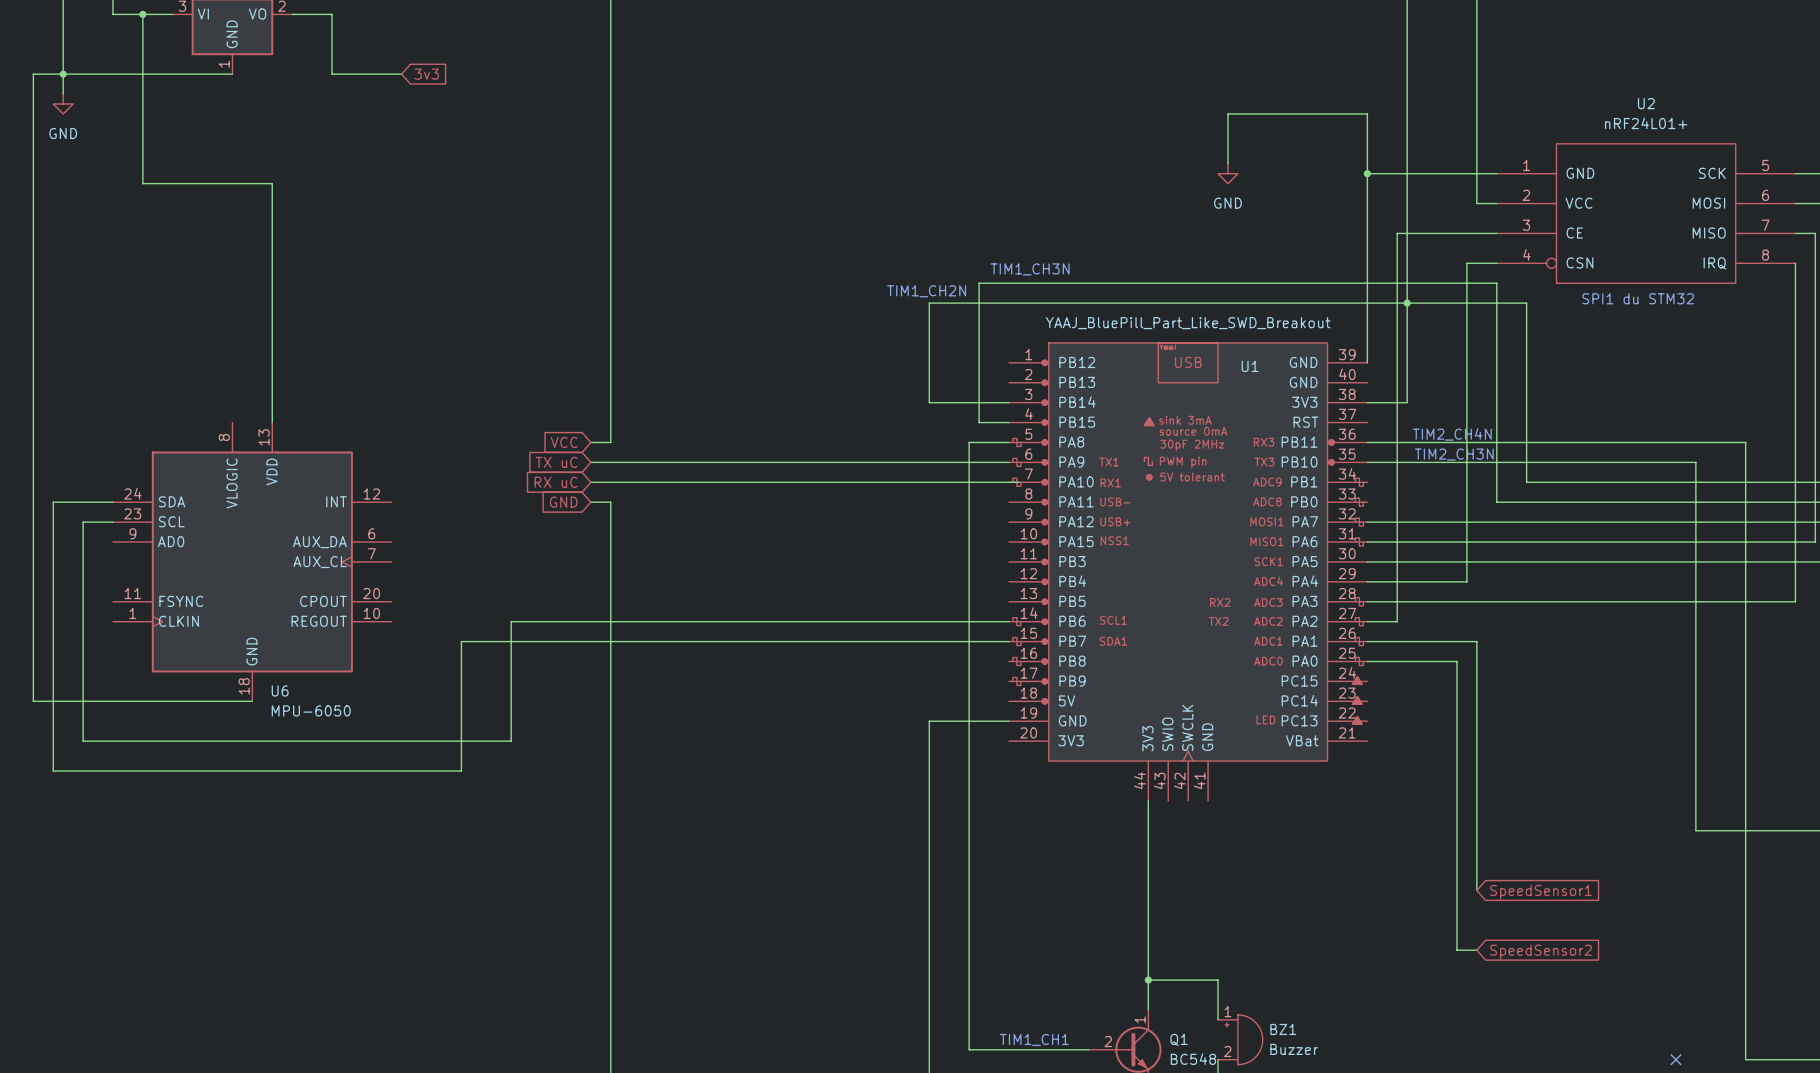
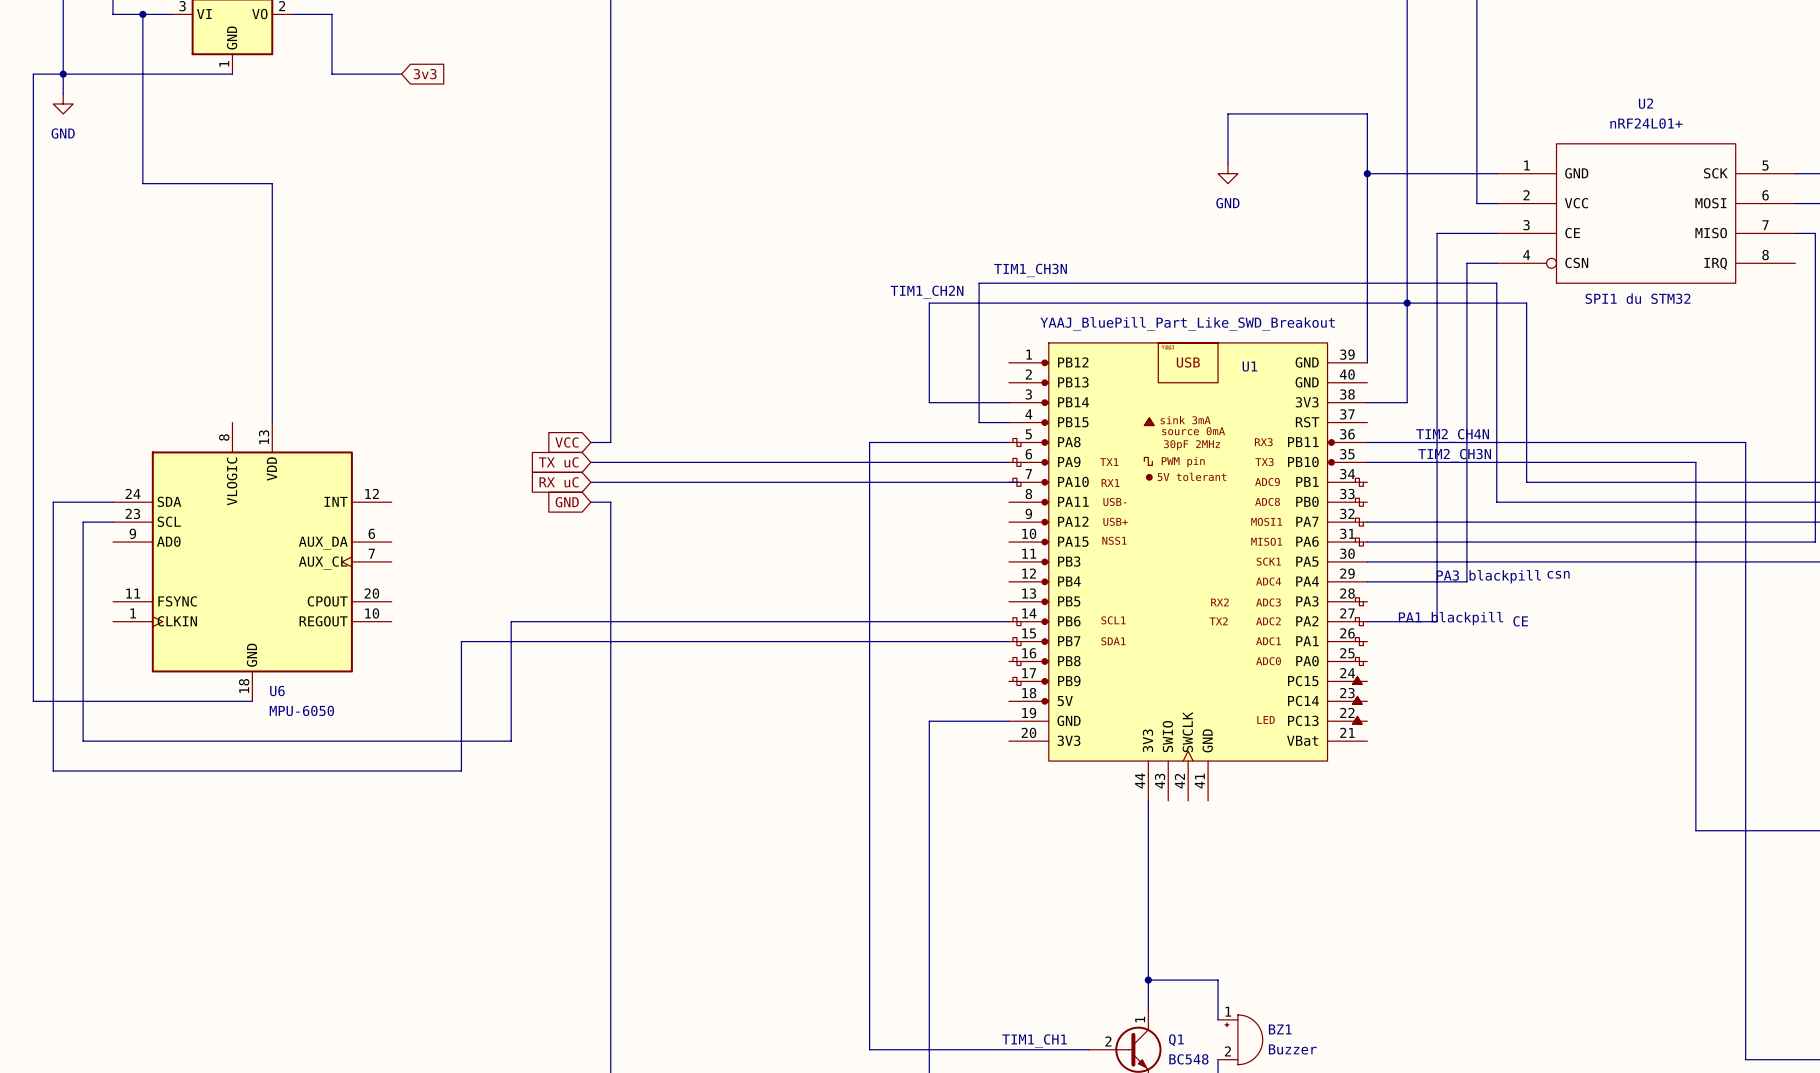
wire: (1437, 233) (1397, 233) (1397, 621) -> (1437, 233) (1437, 621) (1397, 621)
wire: (1795, 263) (1795, 601) (1367, 601) -> none
wire: (969, 442) (969, 1049) -> (969, 442) (869, 442) (869, 1049) (969, 1049)
text: none -> csn (1558, 574)
text: none -> PA3 blackpill (1488, 576)
text: none -> PA1 blackpill (1450, 618)
text: none -> CE (1520, 621)
wire: (1367, 641) (1476, 641) (1476, 890) -> none
wire: (1367, 661) (1456, 661) (1456, 950) (1476, 950) -> none
global label: SpeedSensor1 (1541, 892) -> none
global label: SpeedSensor2 (1541, 951) -> none
no-connect mark: (1675, 1059) -> none

